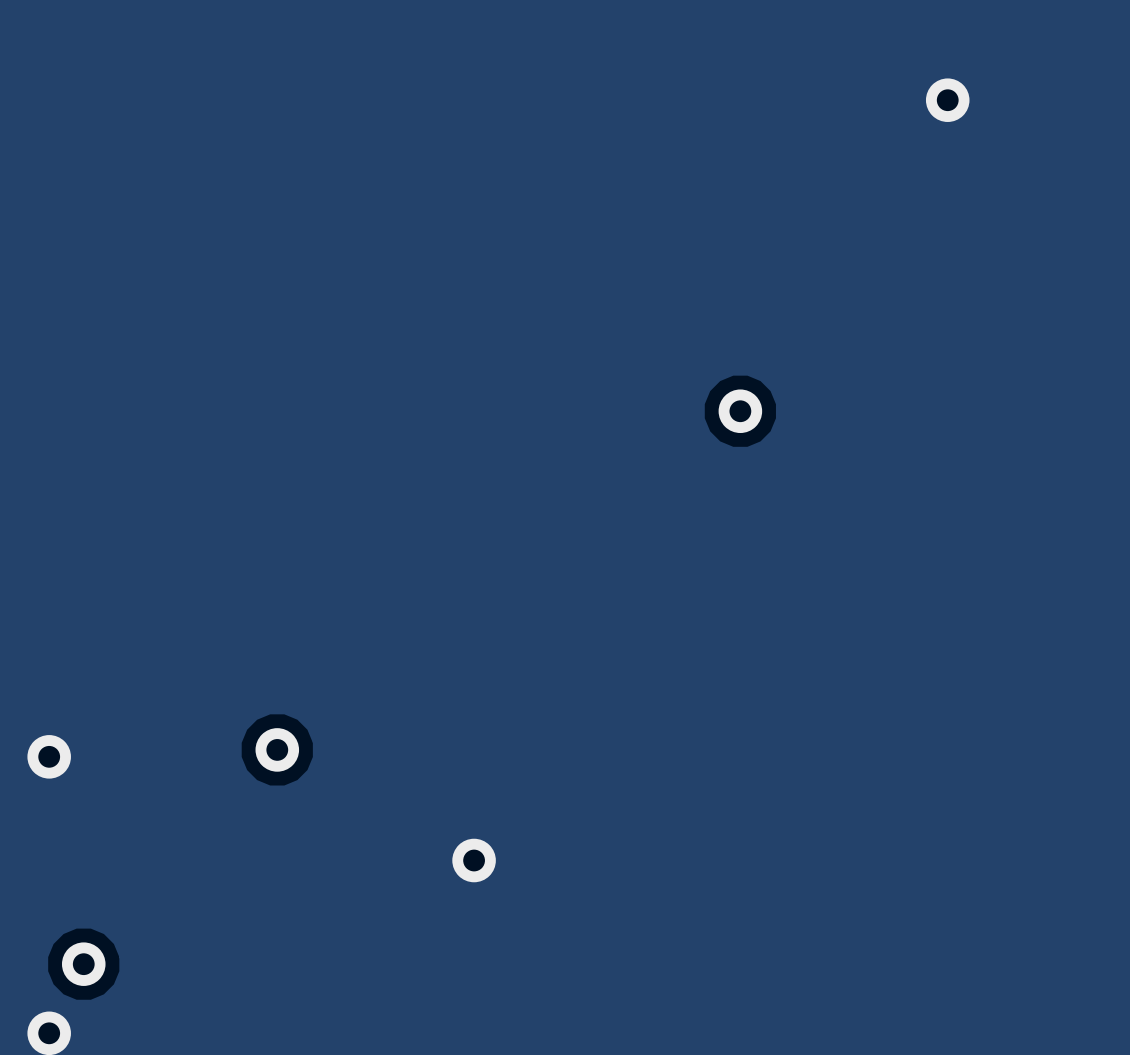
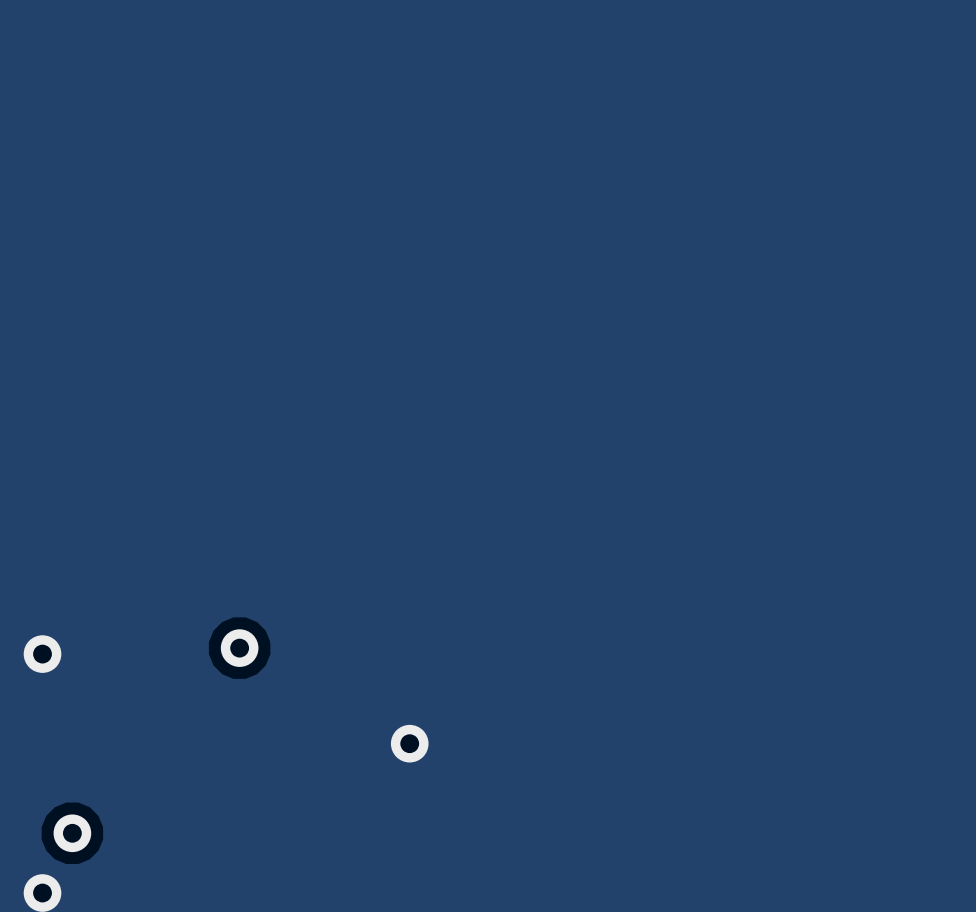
via: (947, 100) -> none
via: (740, 411) -> none

